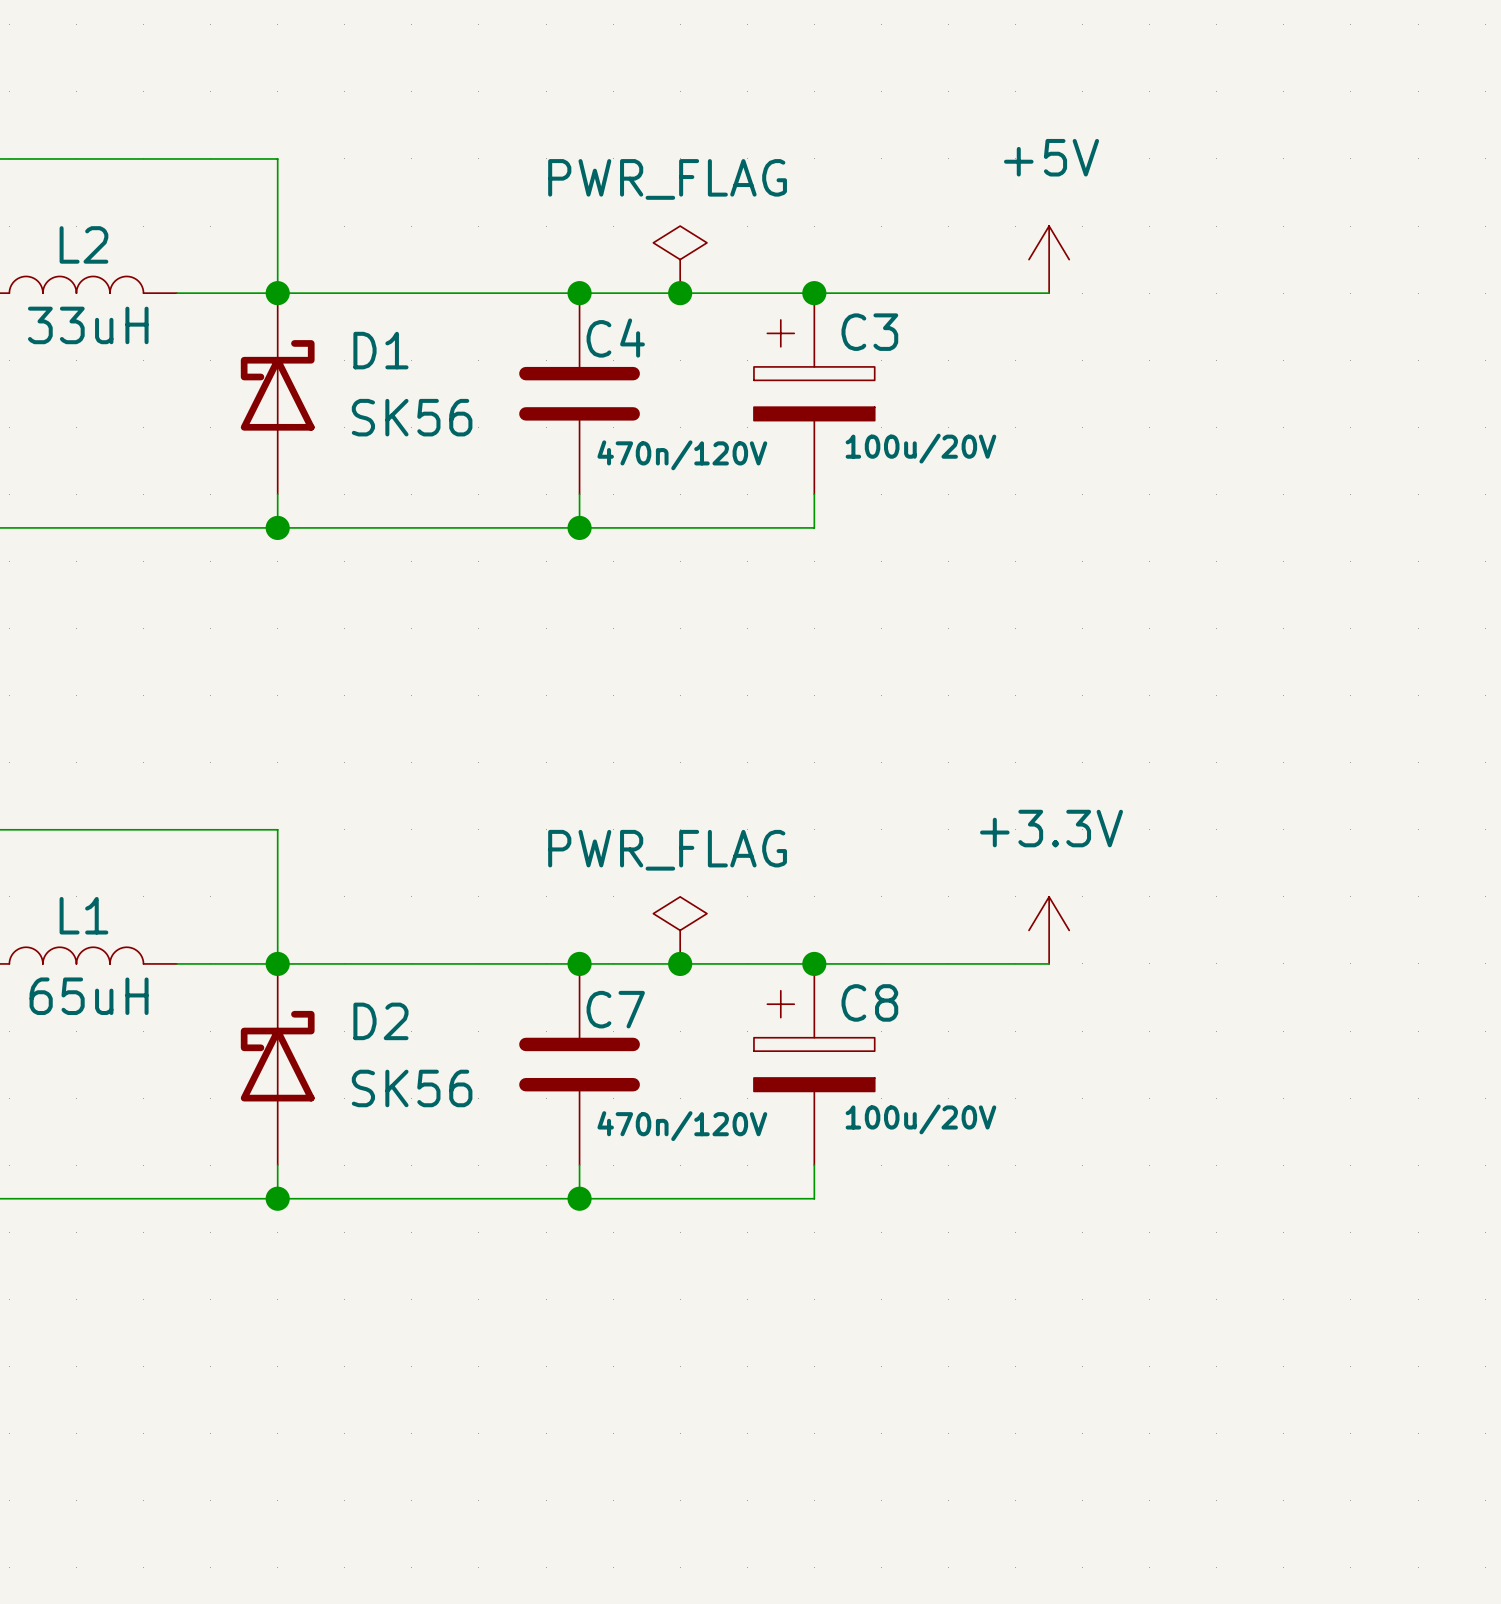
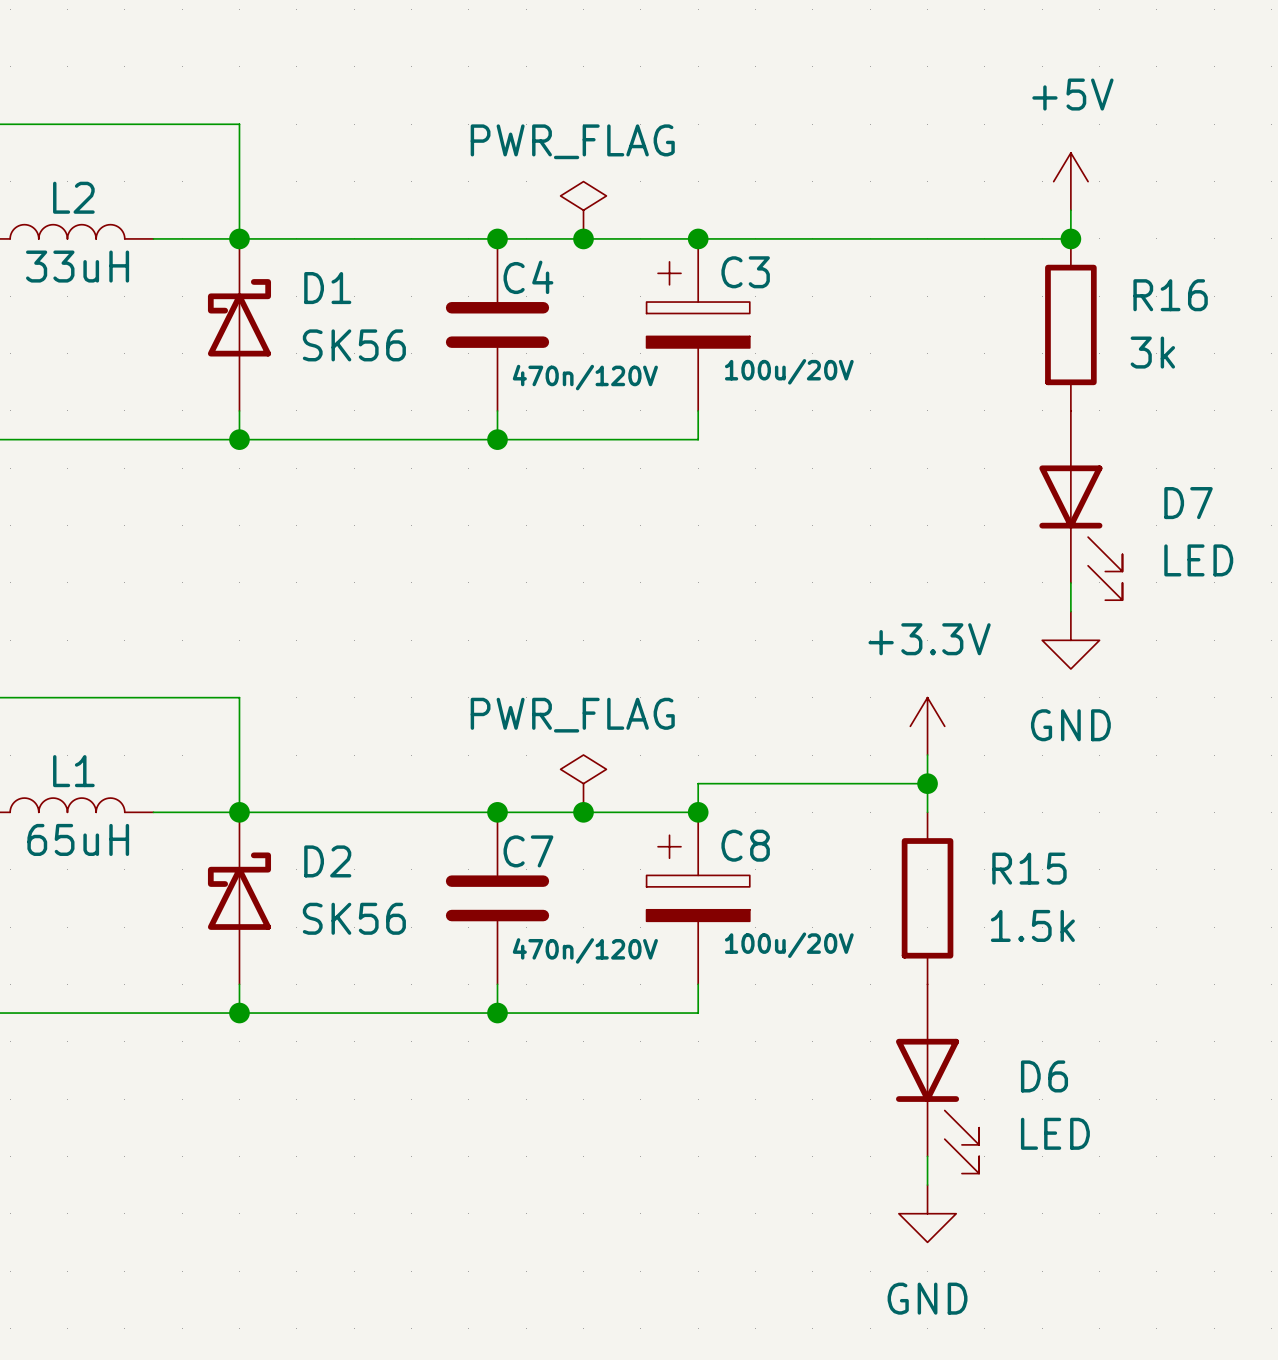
power symbol position: +5V (1049, 259) -> +5V (1070, 181)
wire: none -> (1070, 210) (1070, 238) (898, 238)
junction: none -> (1070, 238)
R16: none -> 3k (1070, 324)
D7: none -> LED (1080, 505)
wire: none -> (1070, 582) (1070, 611)
power symbol: none -> GND (1070, 640)
wire: none -> (927, 755) (927, 812)
power symbol position: +3.3V (1049, 930) -> +3.3V (927, 726)
junction: none -> (927, 783)
wire: (814, 963) (1049, 963) -> (698, 812) (698, 783) (927, 783)
R15: none -> 1.5k (927, 898)
D6: none -> LED (937, 1078)
wire: none -> (927, 1156) (927, 1185)
power symbol: none -> GND (927, 1213)

